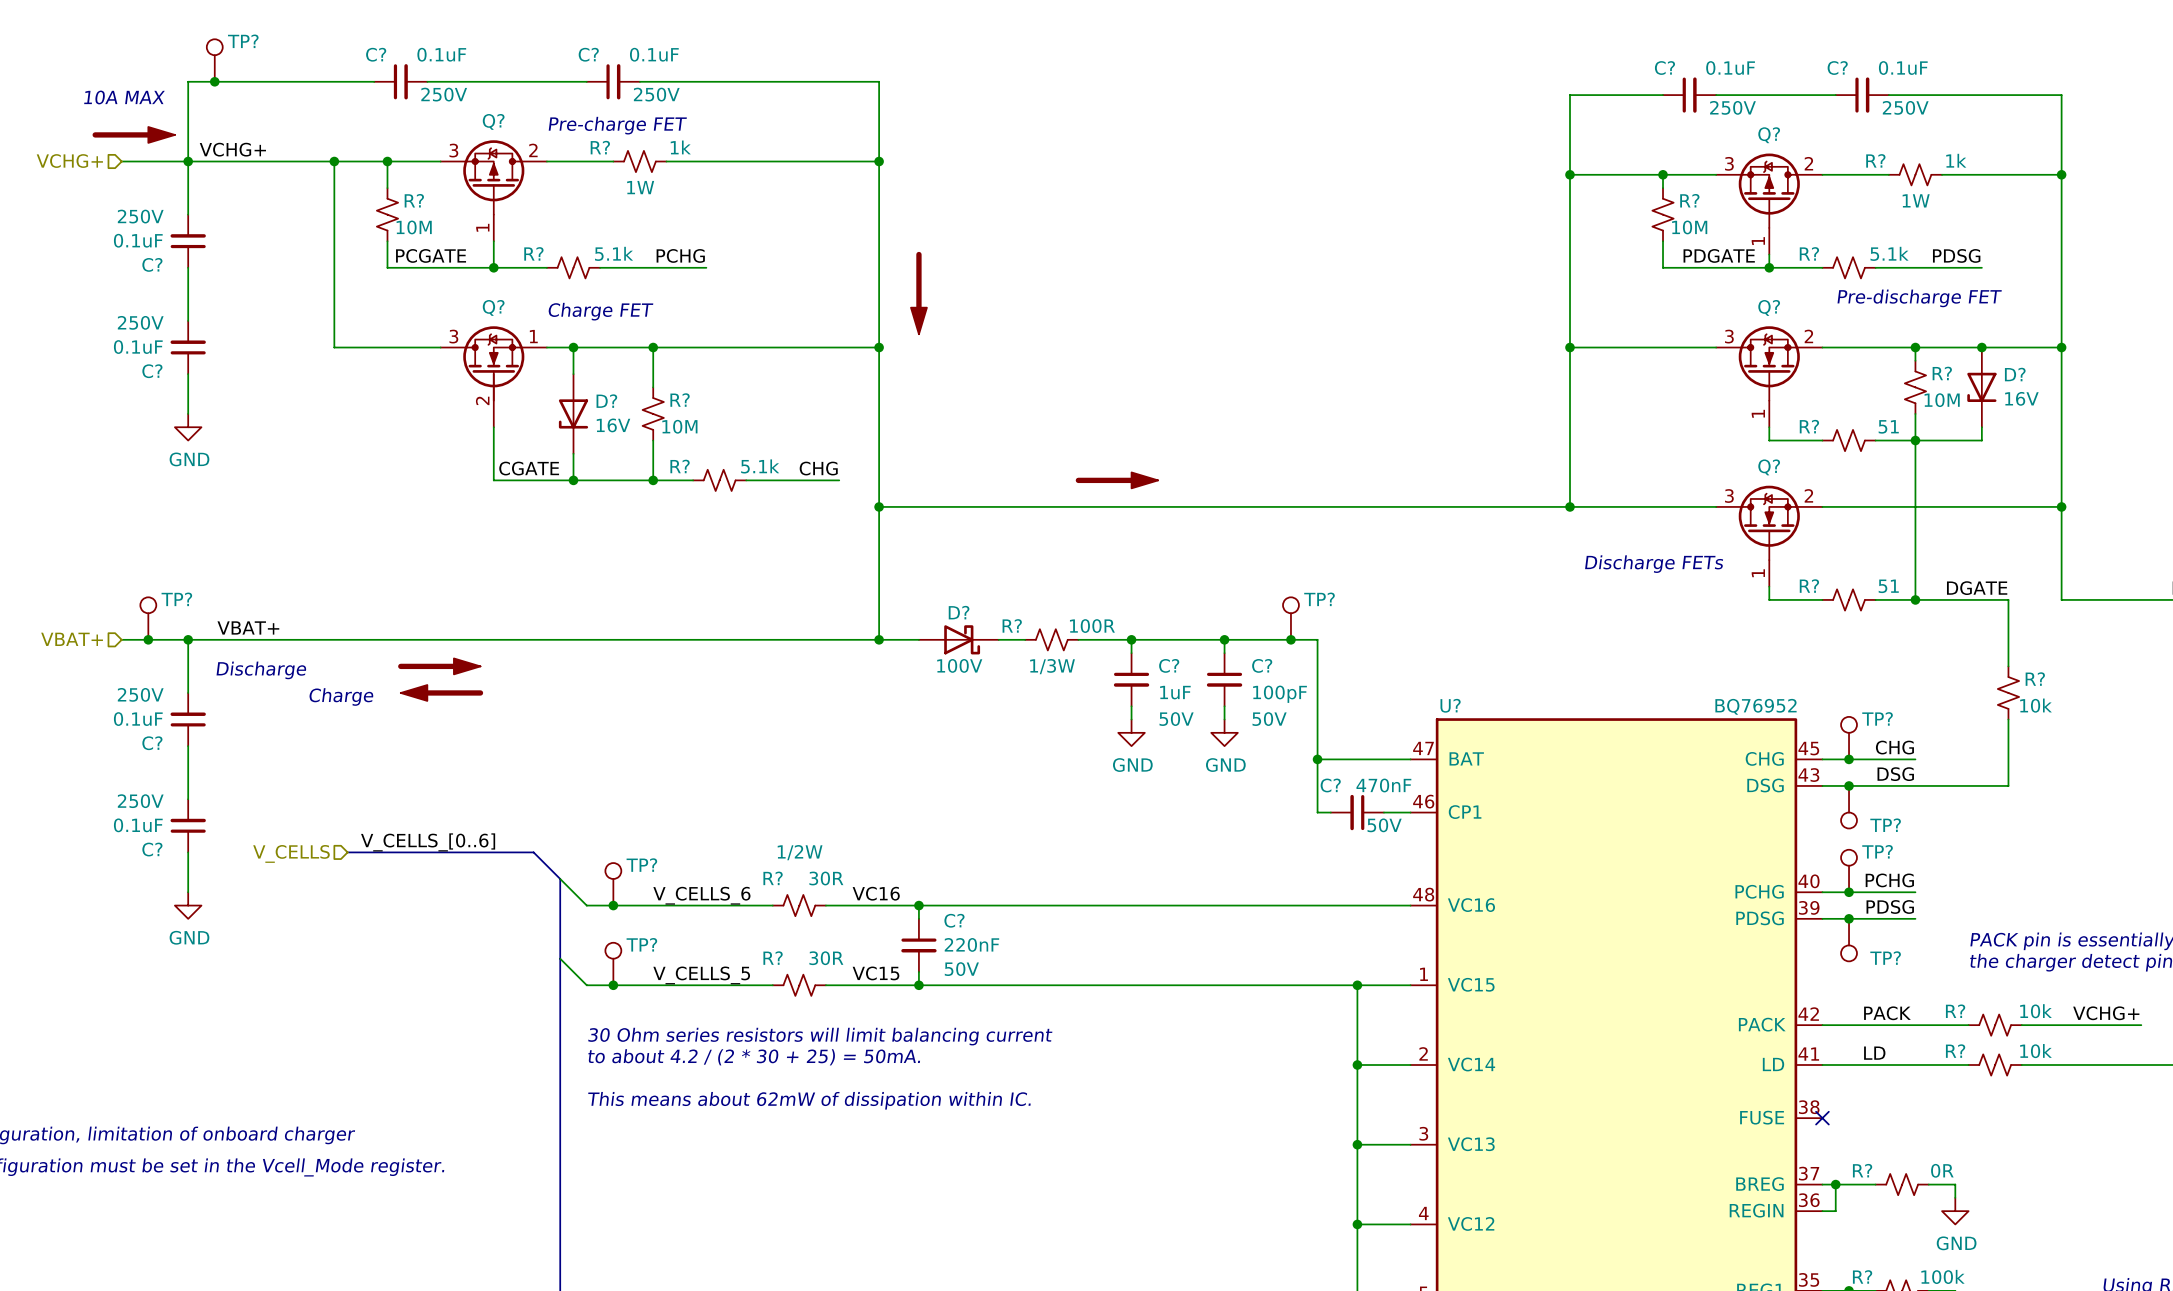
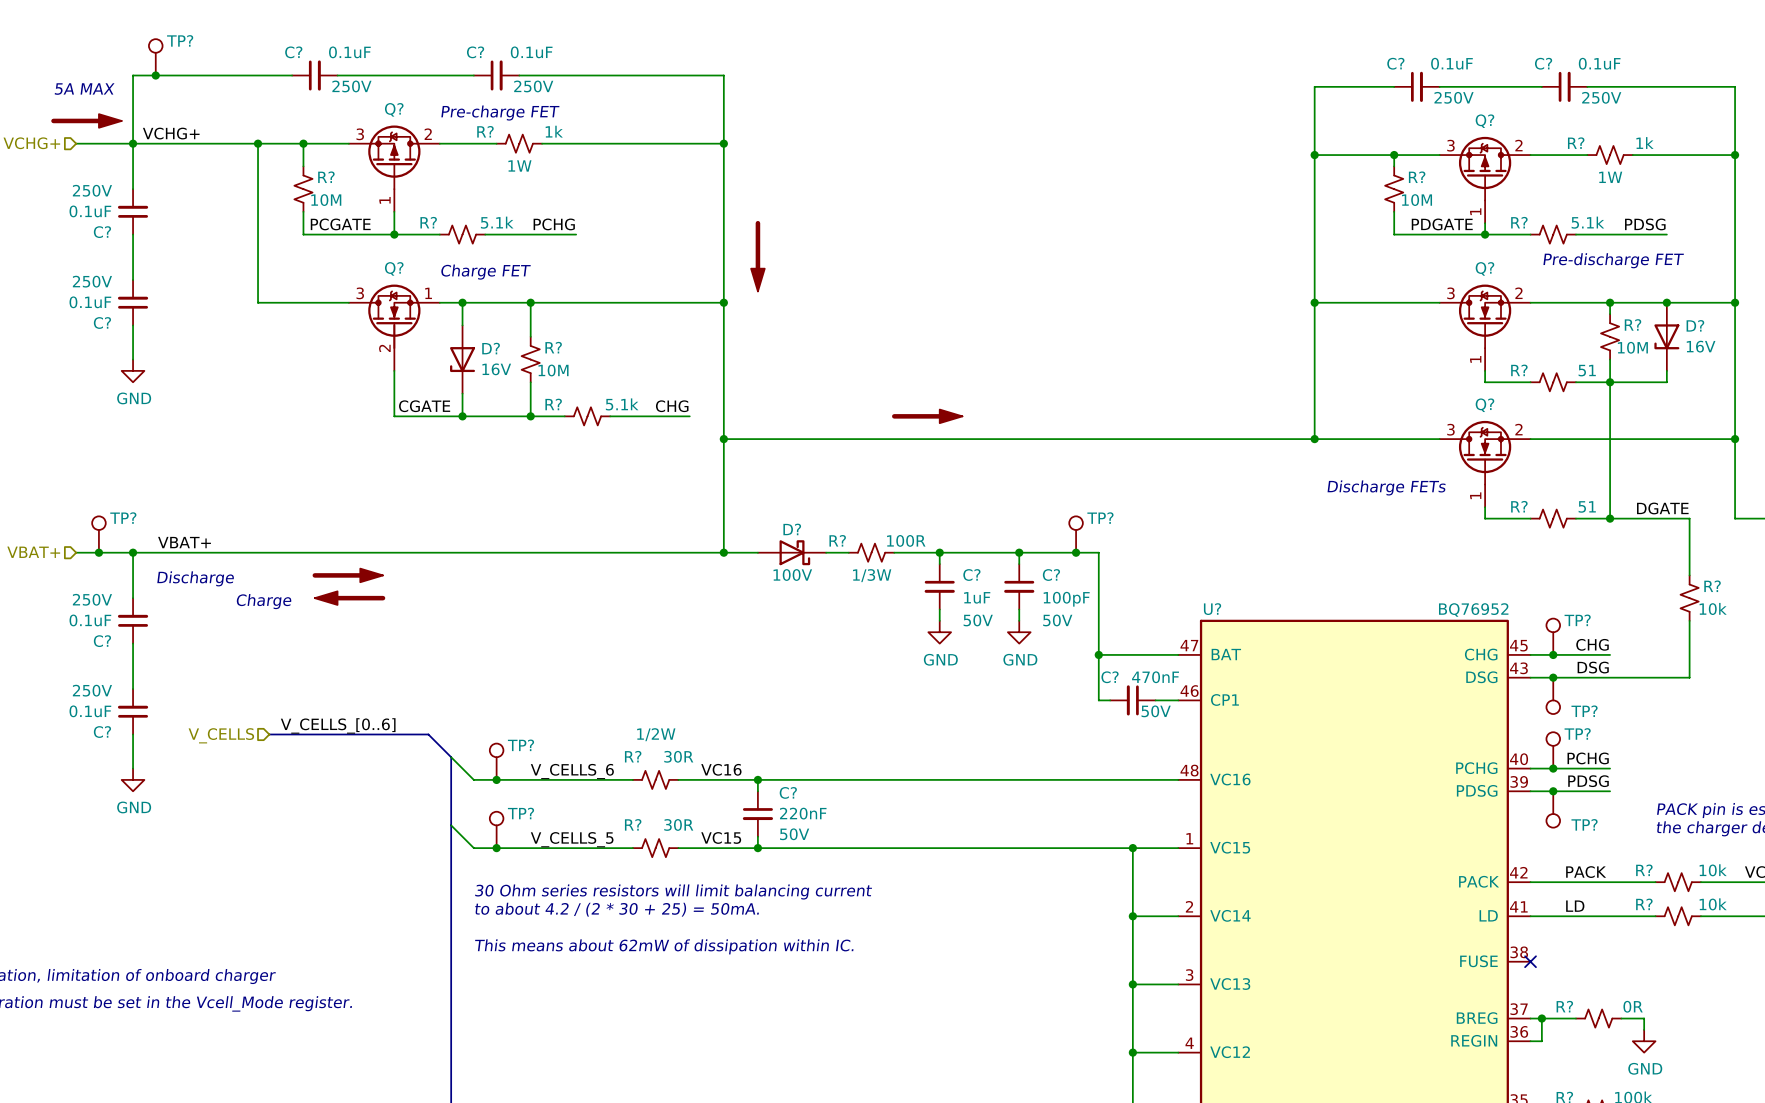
text: 10A MAX (124, 97) -> 5A MAX (84, 89)

